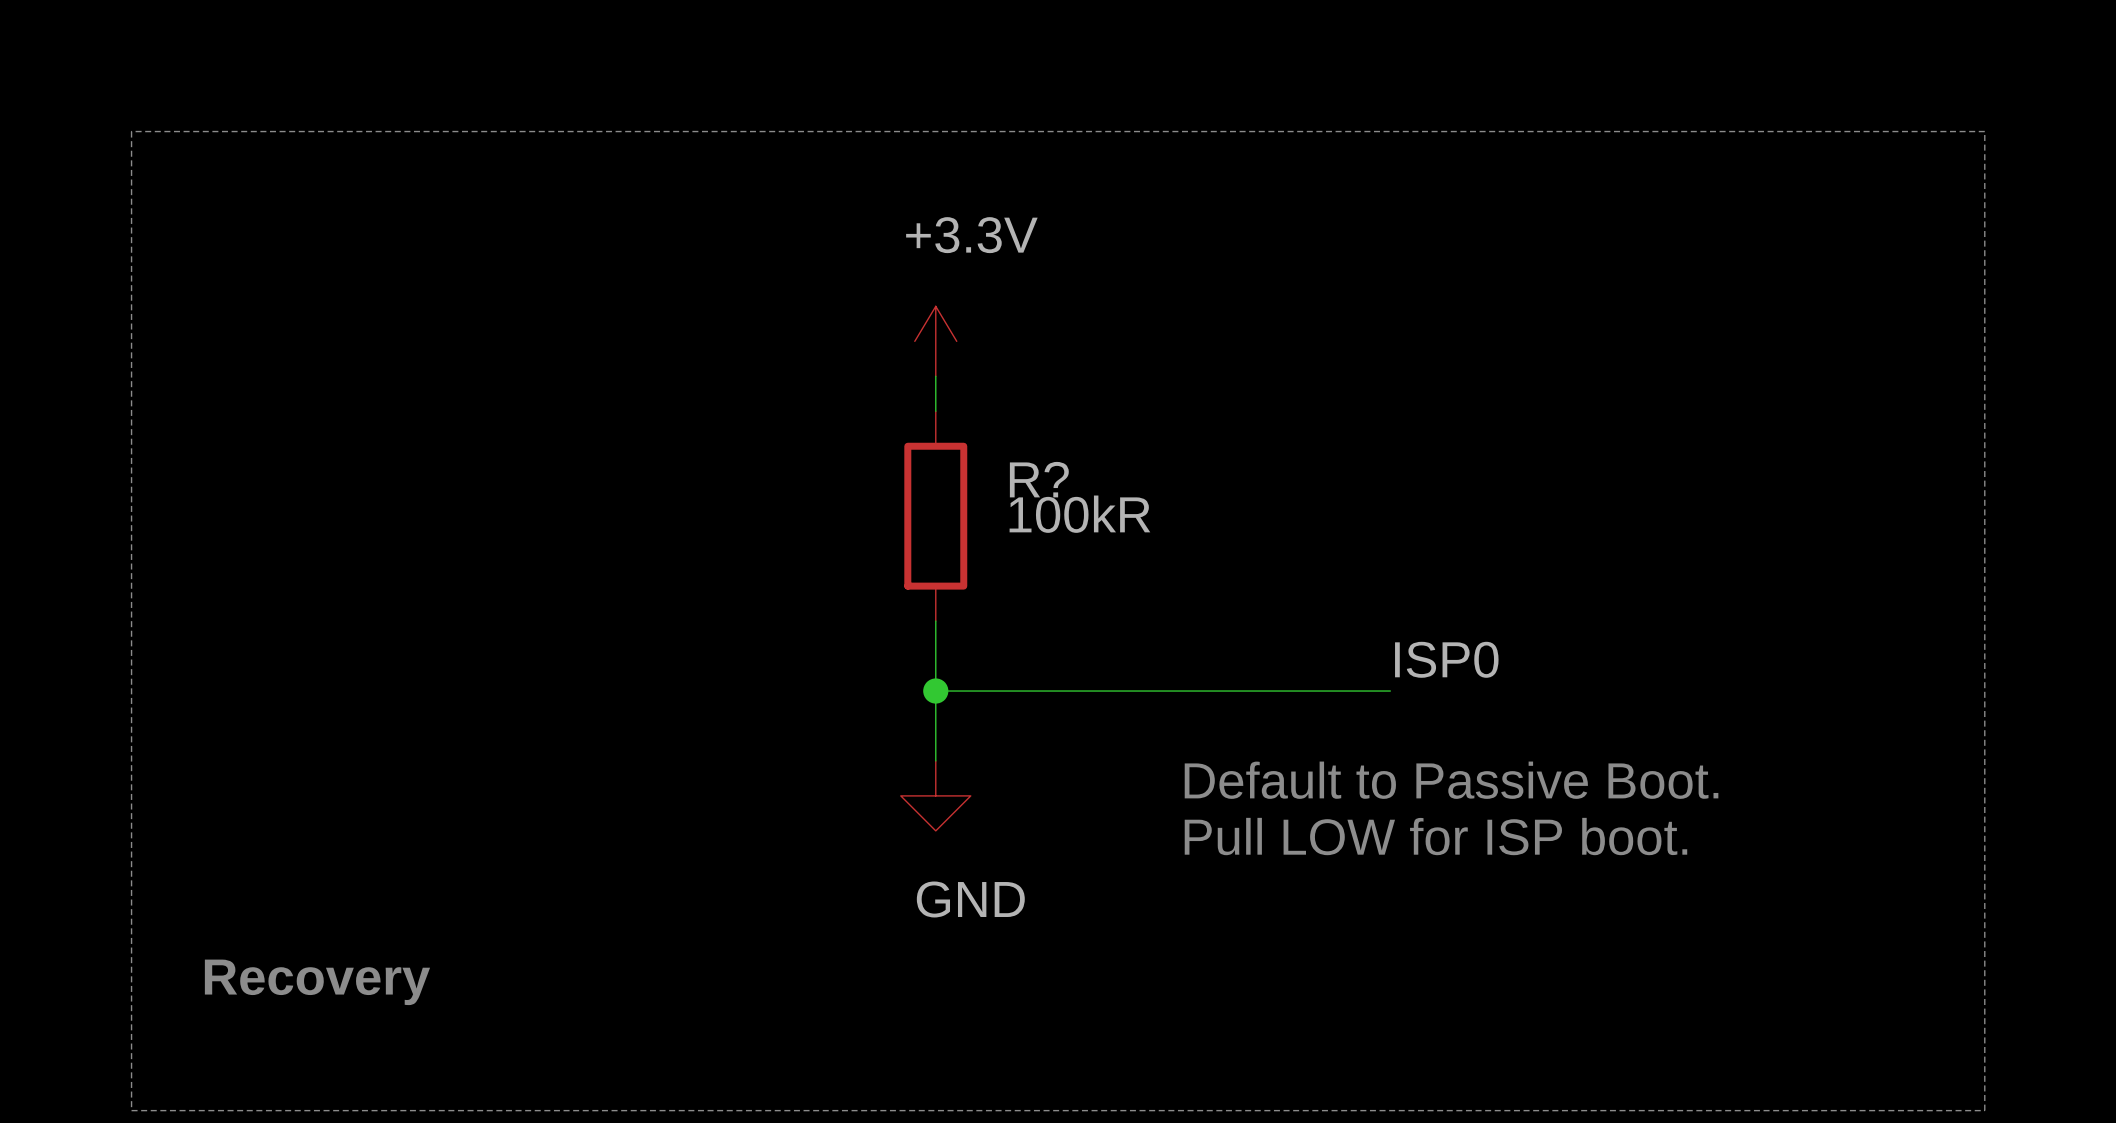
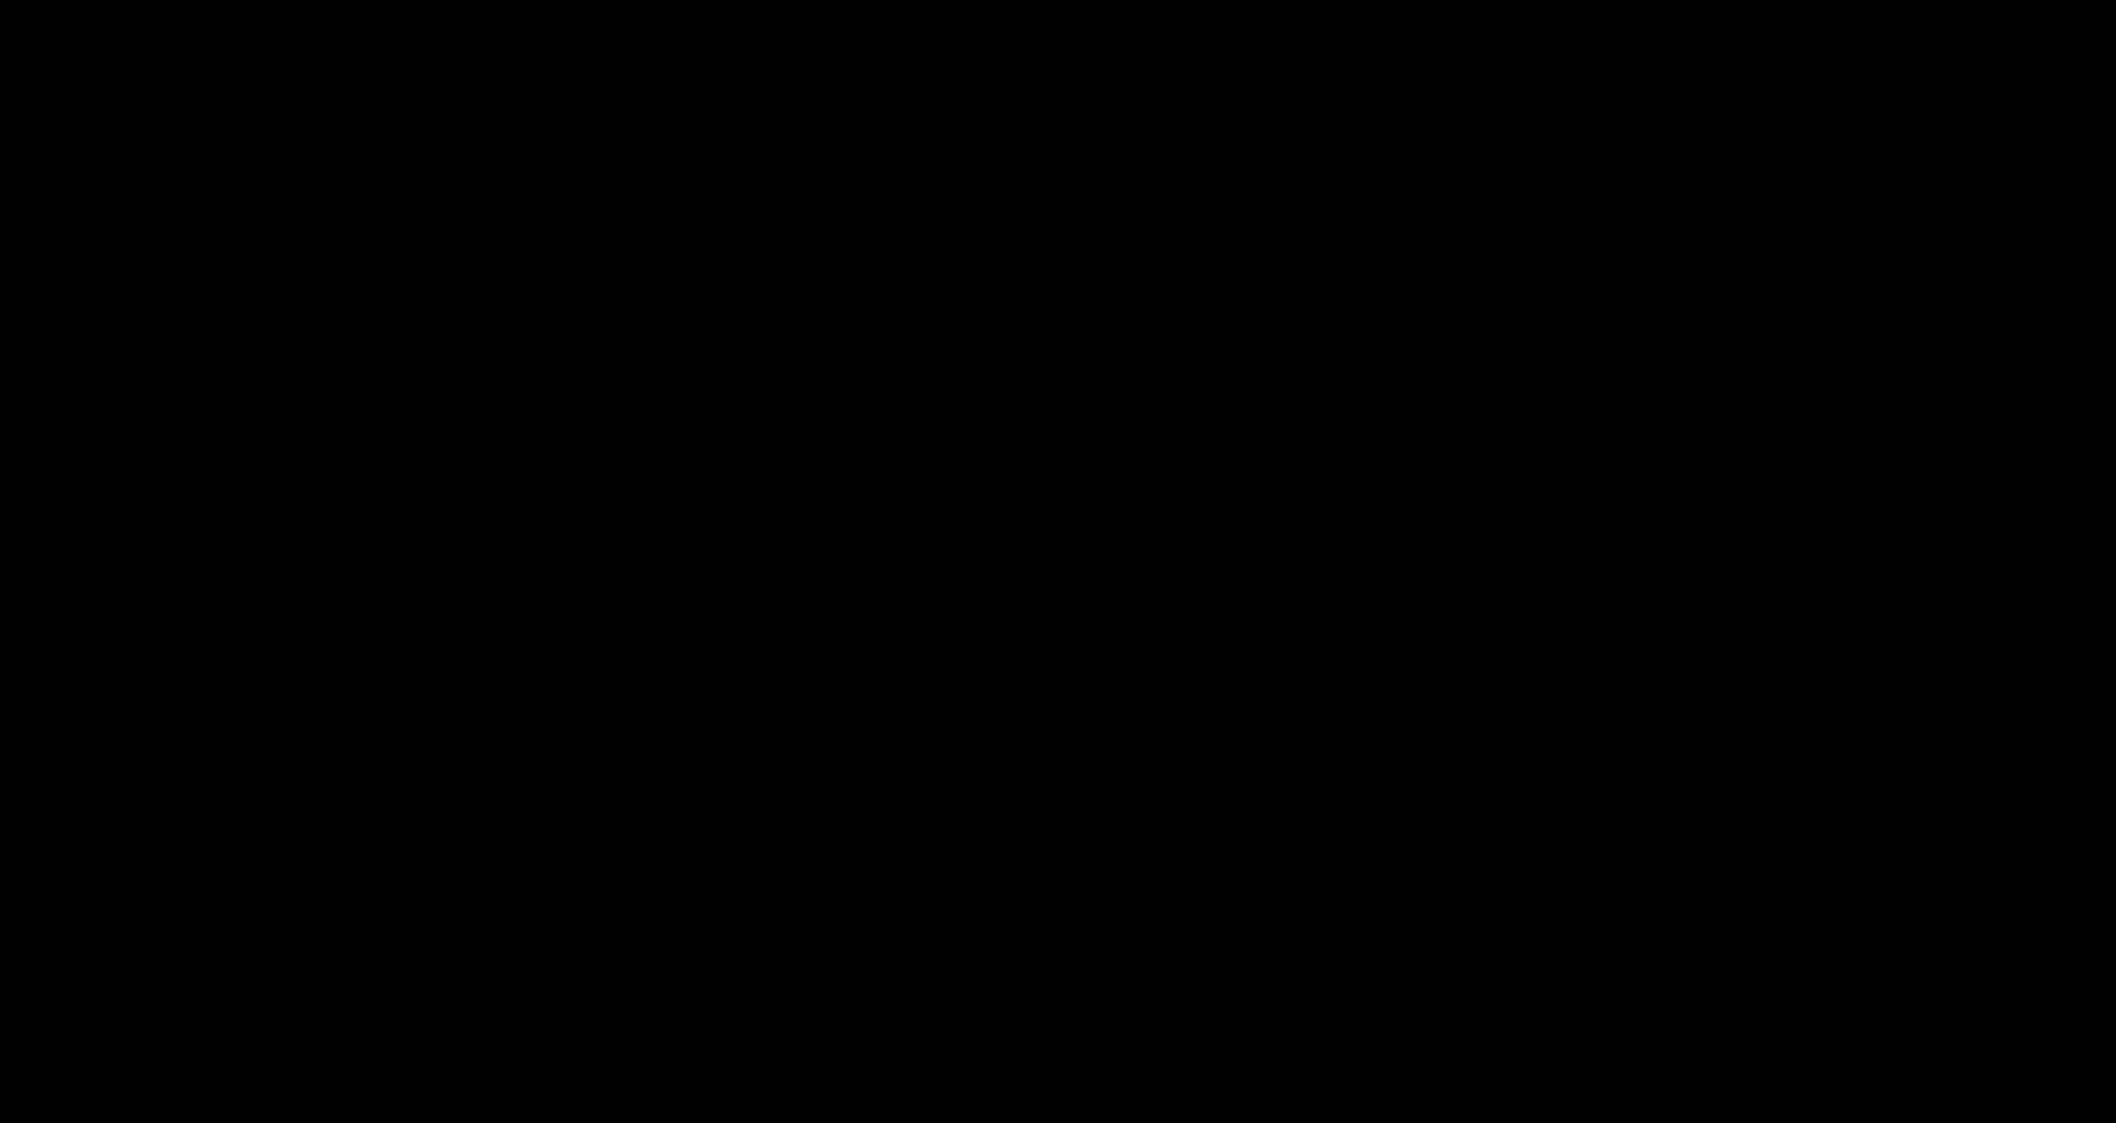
line: (131, 131) (1984, 131) (1984, 1110) (131, 1110) (131, 131) -> none
power symbol: +3.3V (935, 341) -> none
wire: (935, 376) (935, 411) -> none
R?: 100kR (935, 516) -> none
wire: (935, 621) (935, 760) -> none
label: ISP0 (1446, 659) -> none
wire: (935, 691) (1390, 691) -> none
junction: (935, 691) -> none
text: Default to Passive Boot. (1451, 780) -> none
power symbol: GND (935, 795) -> none
text: Pull LOW for ISP boot. (1435, 836) -> none
text: Recovery (317, 982) -> none

